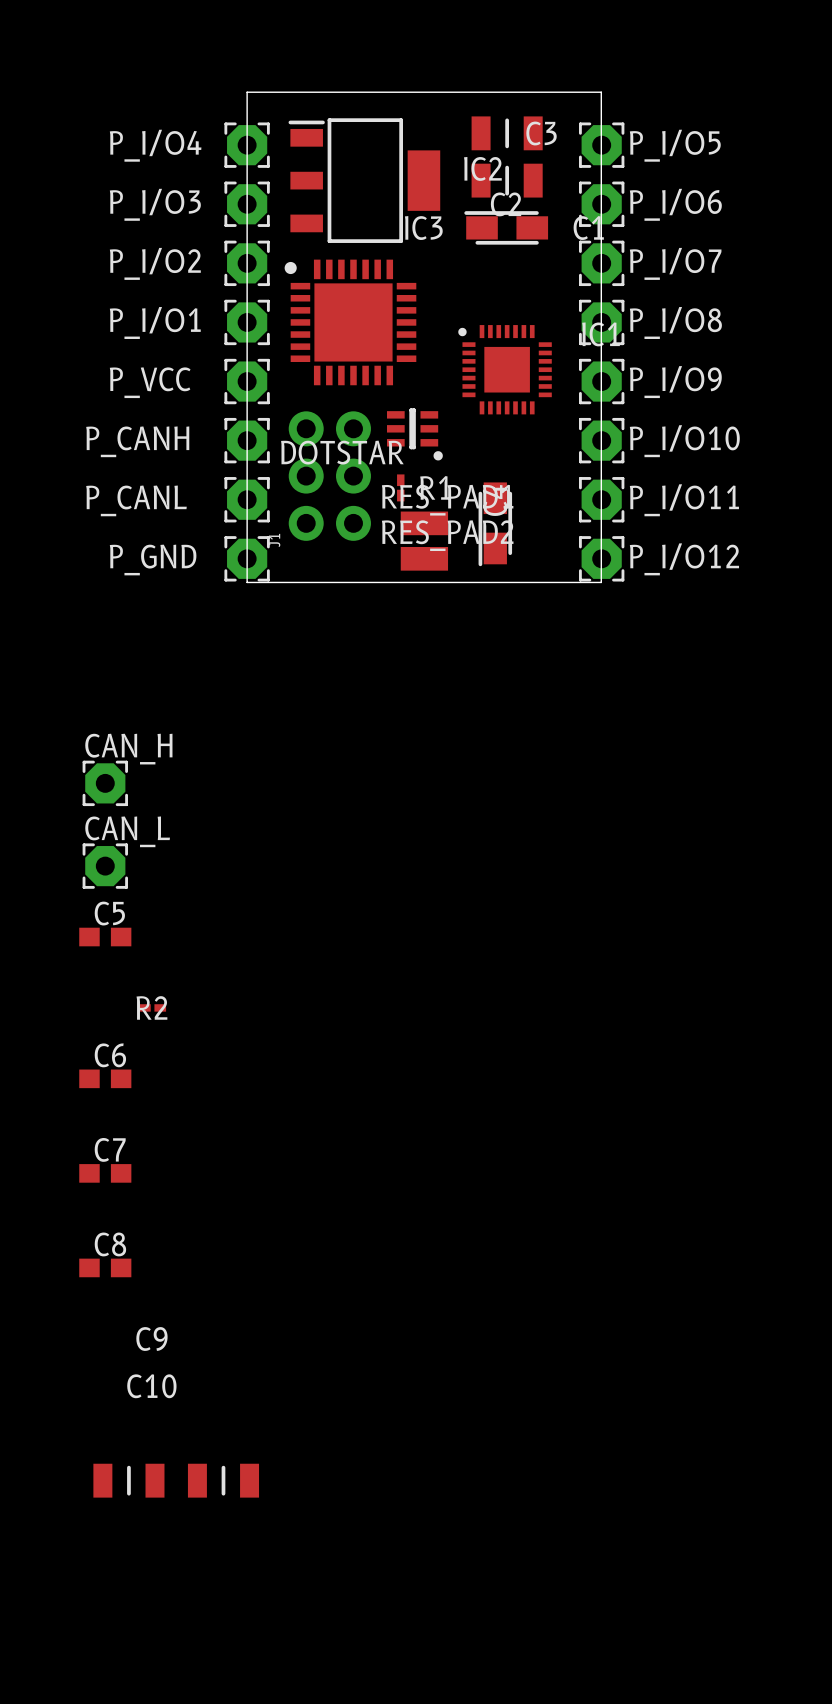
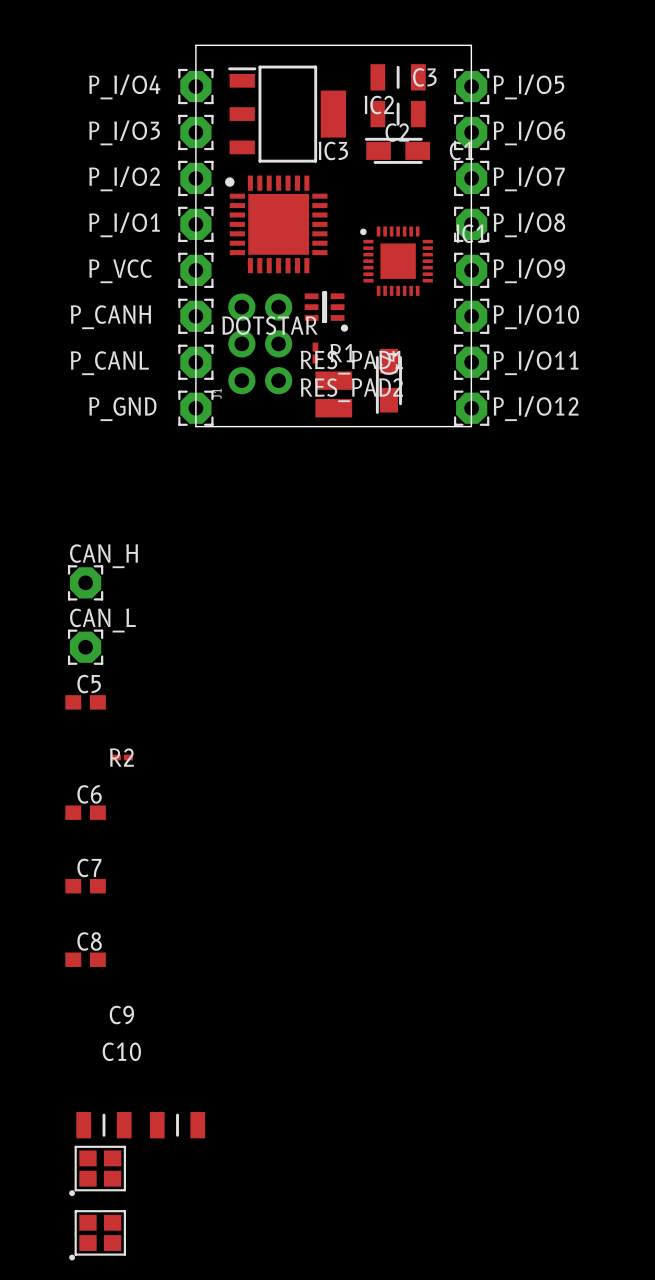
part: none -> (97, 1170)
part: none -> (97, 1235)

